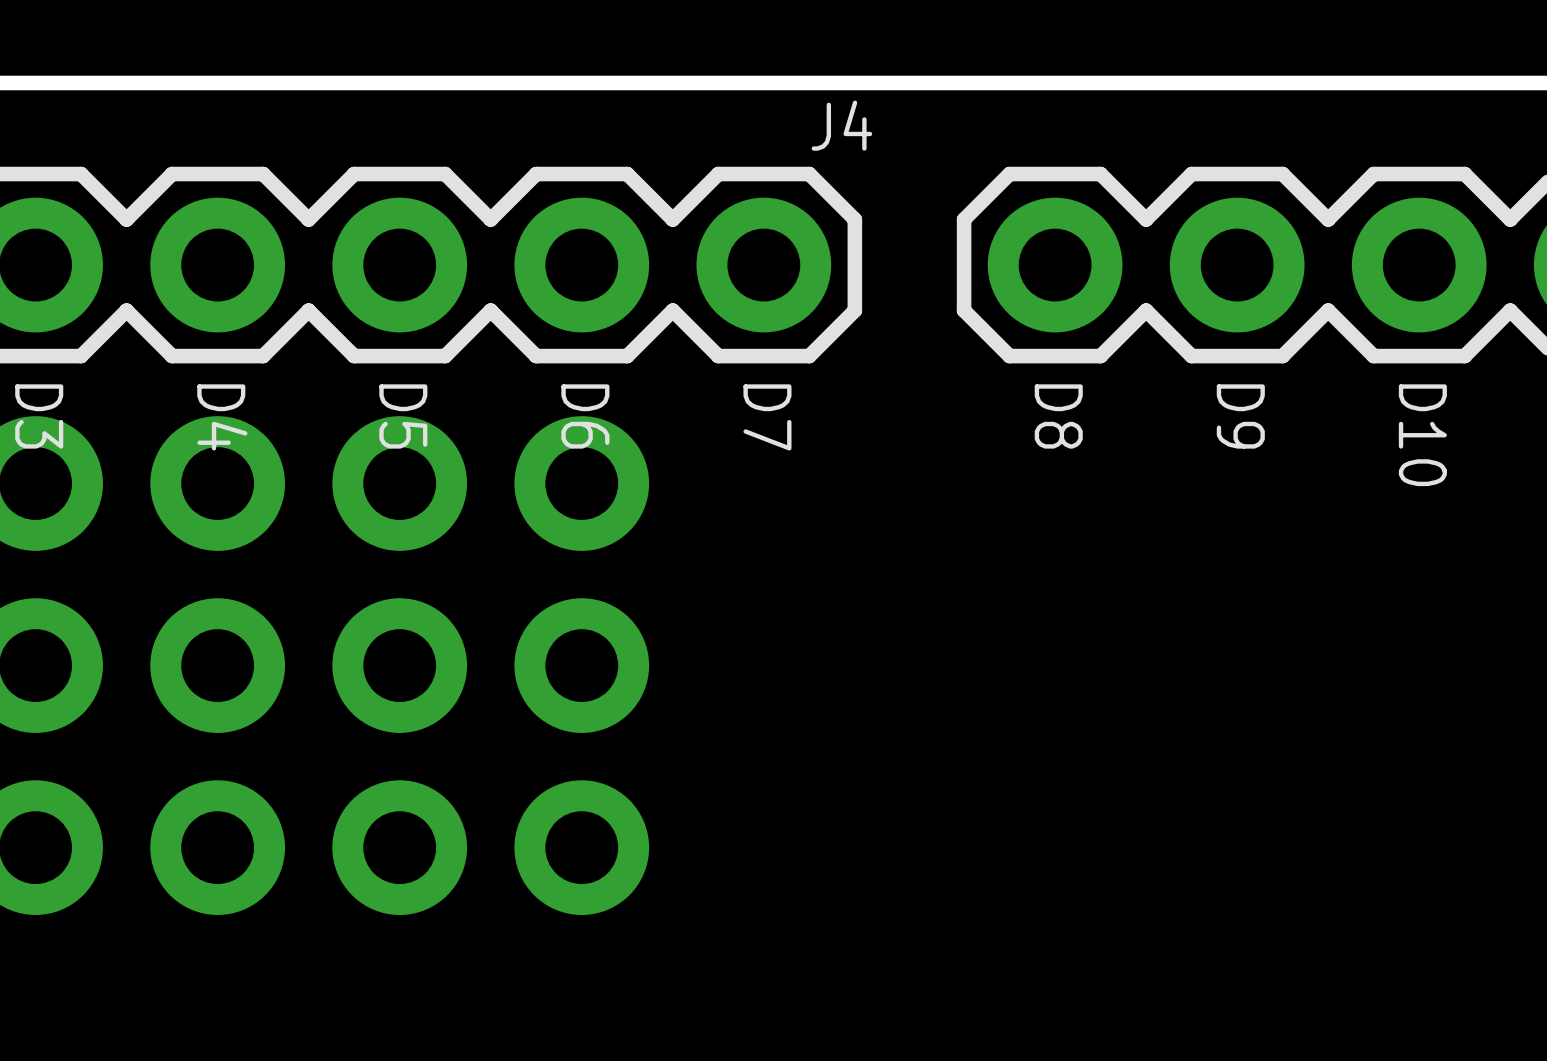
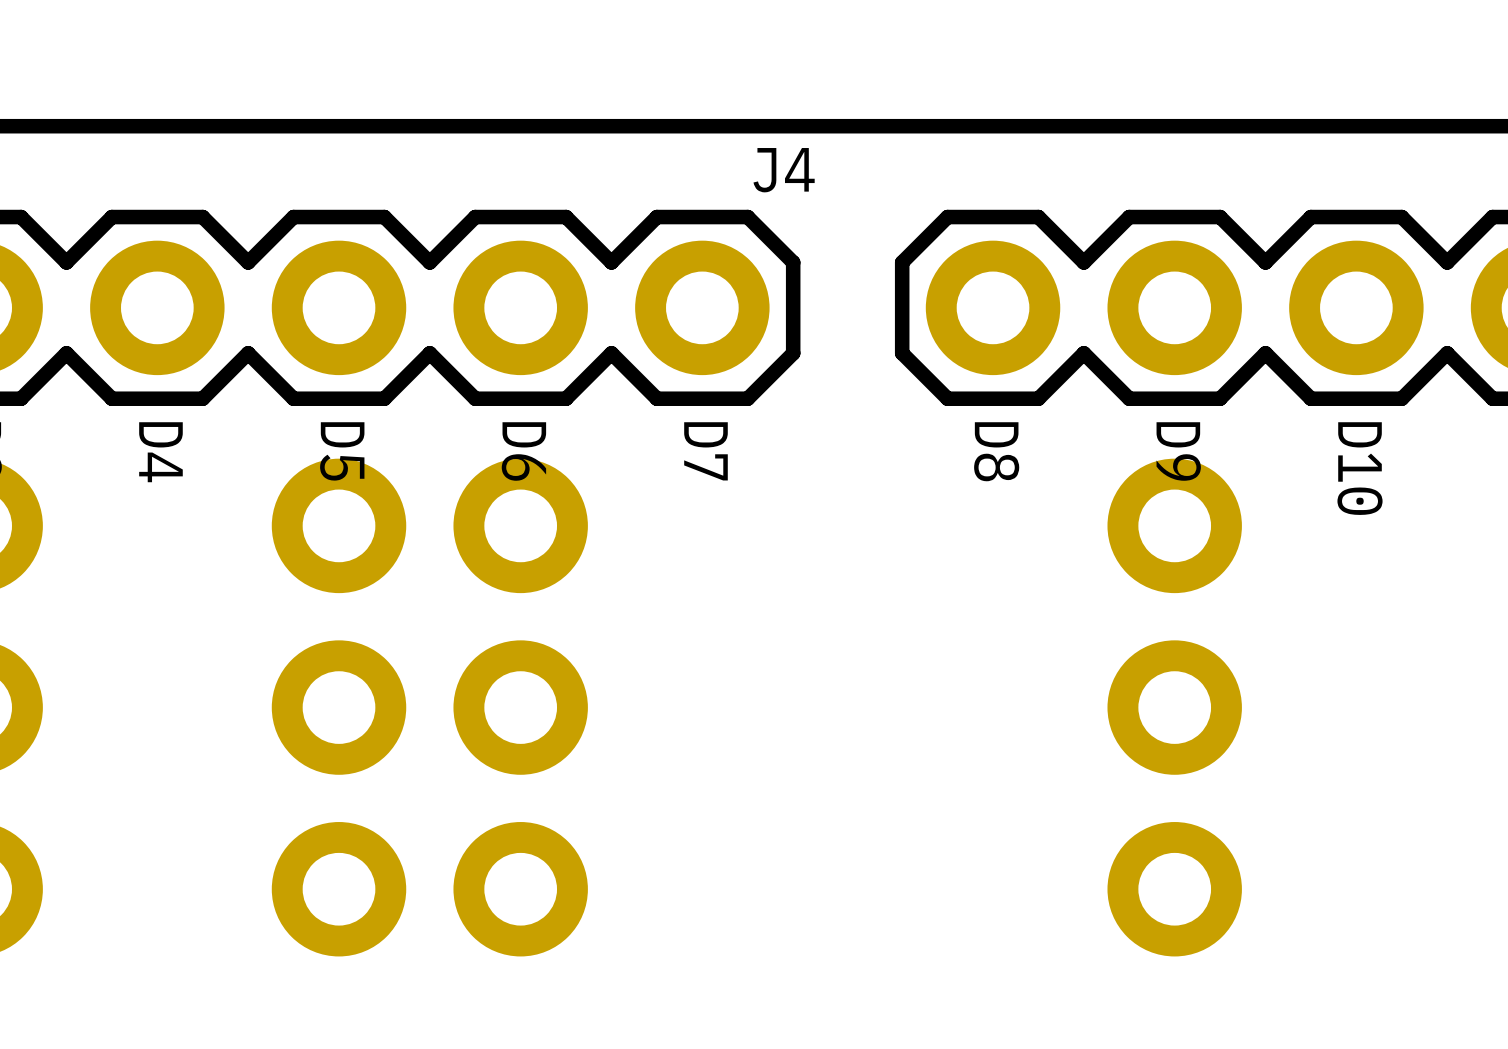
part position: (217, 665) -> (1174, 707)

